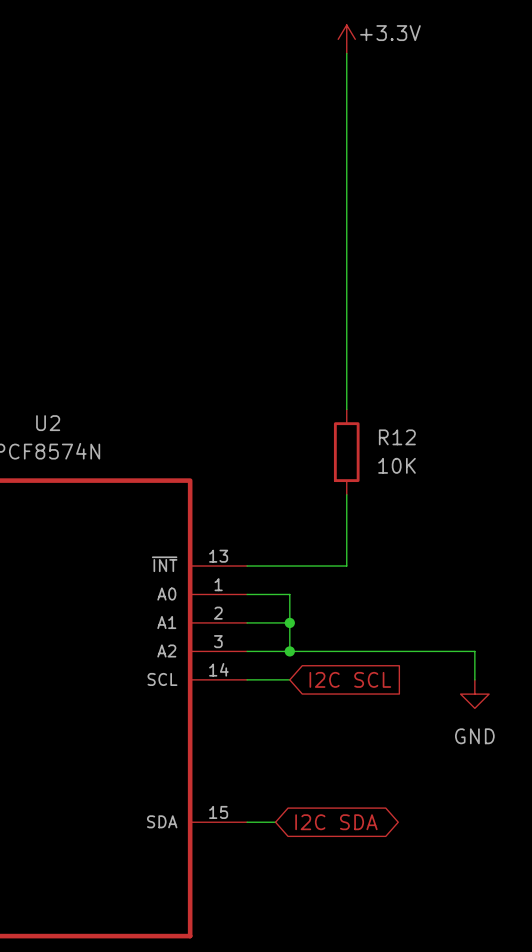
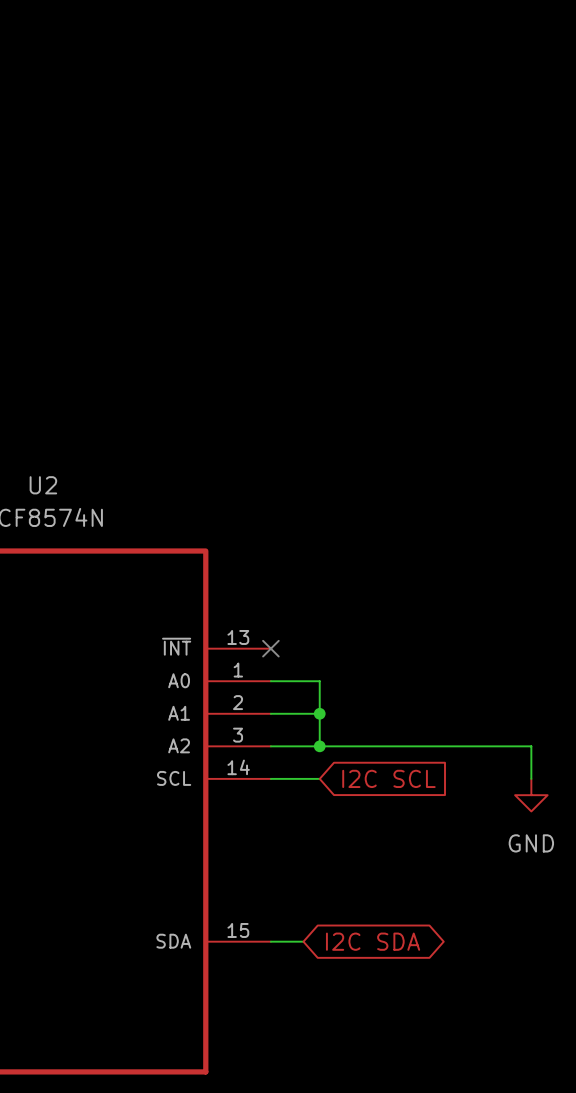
power symbol: +3.3V (346, 39) -> none
wire: (346, 53) (346, 409) -> none
R12: 10K (346, 452) -> none
wire: (346, 494) (346, 566) (247, 566) -> none
no-connect mark: none -> (270, 648)

